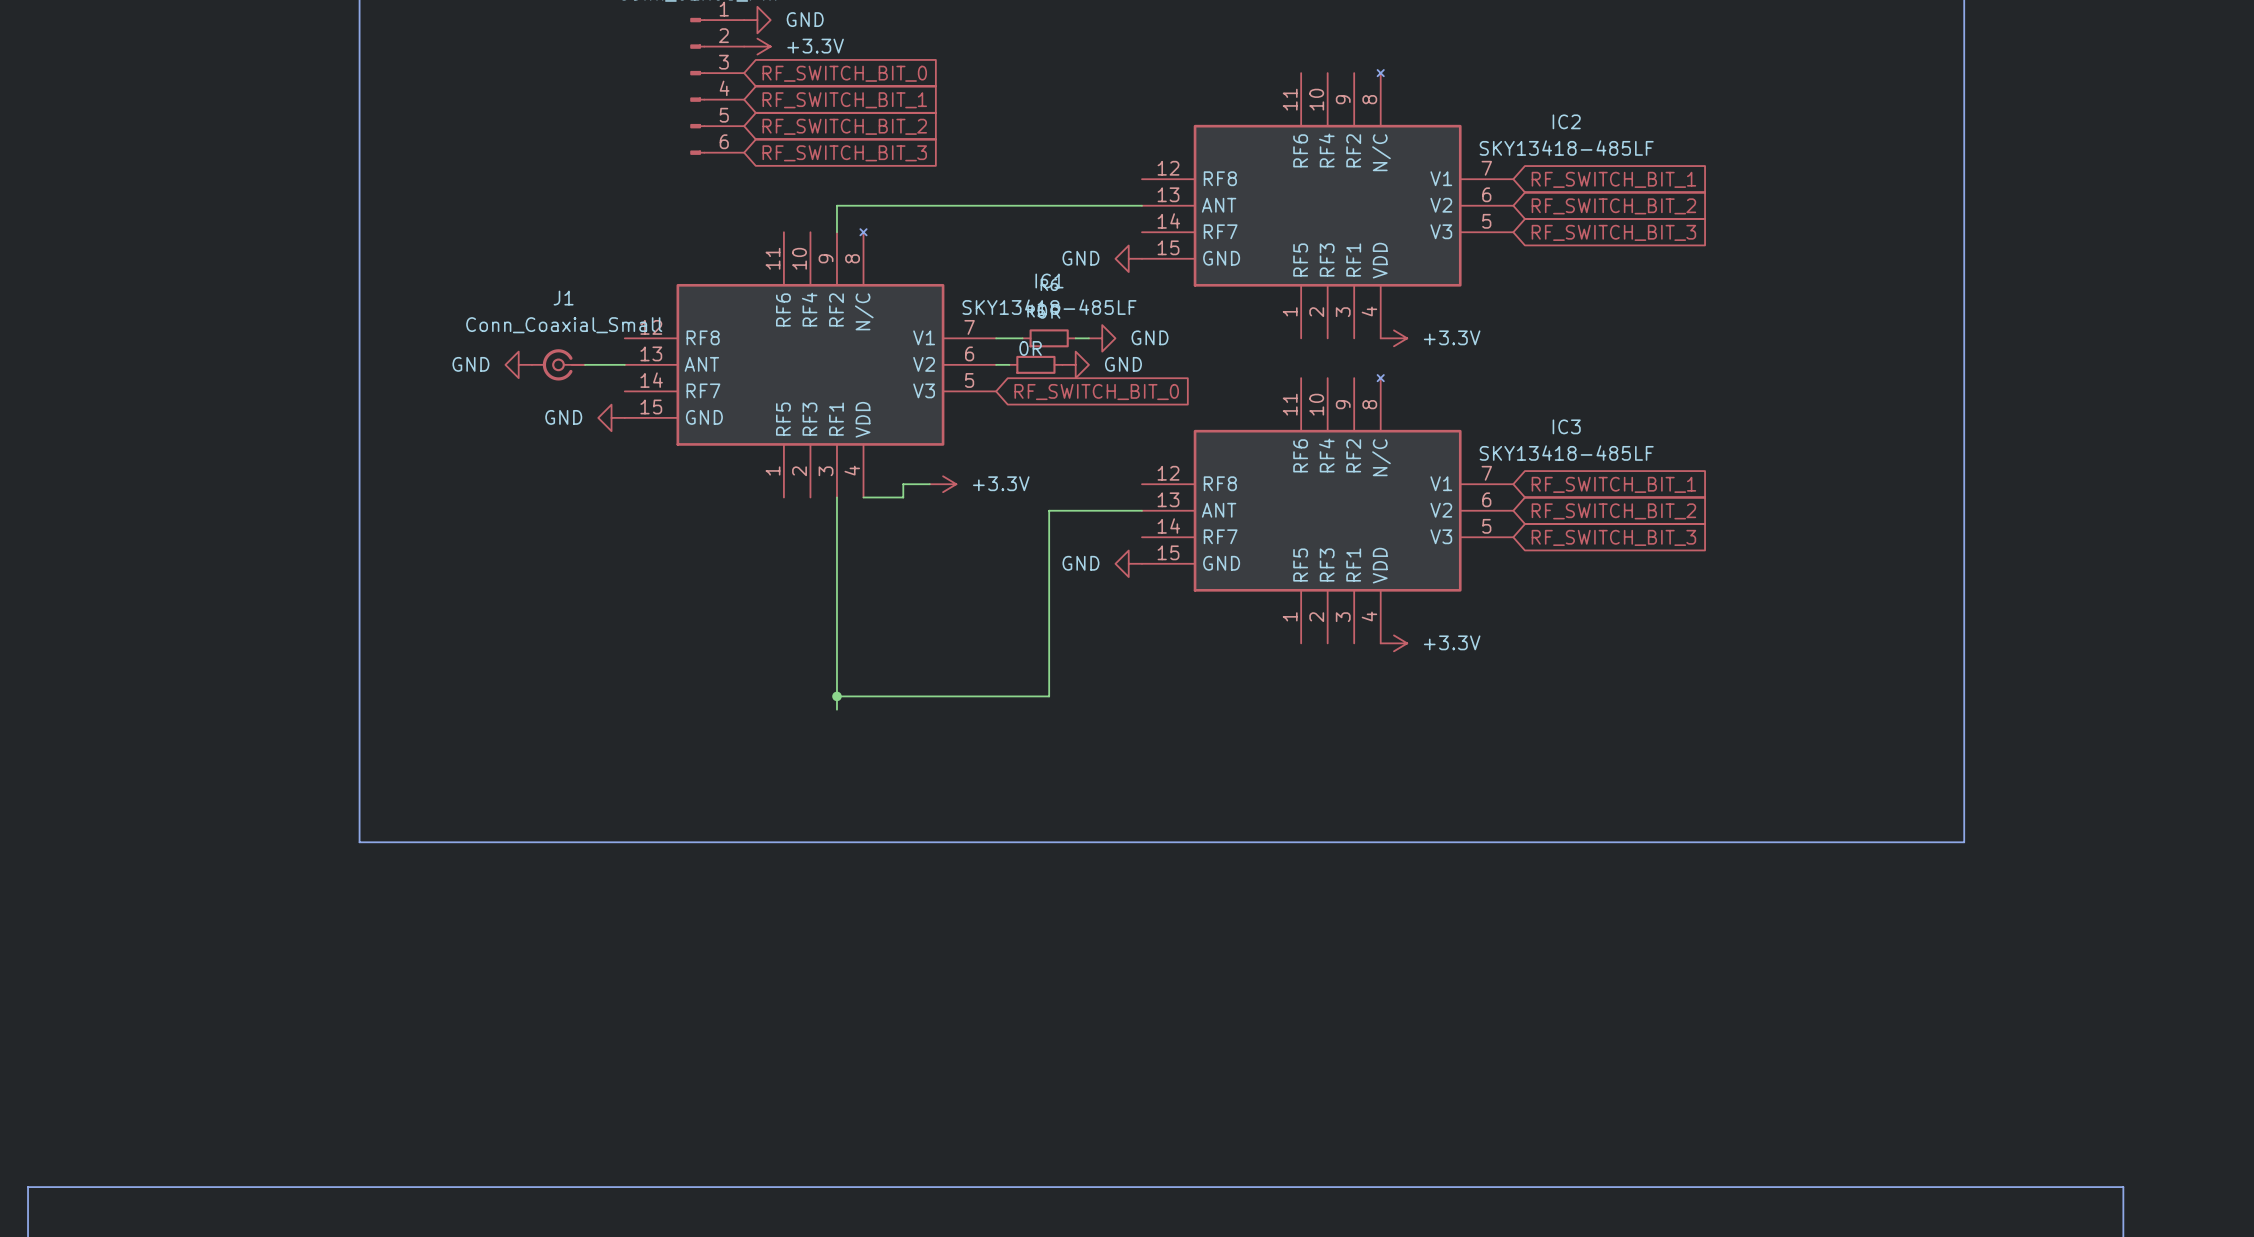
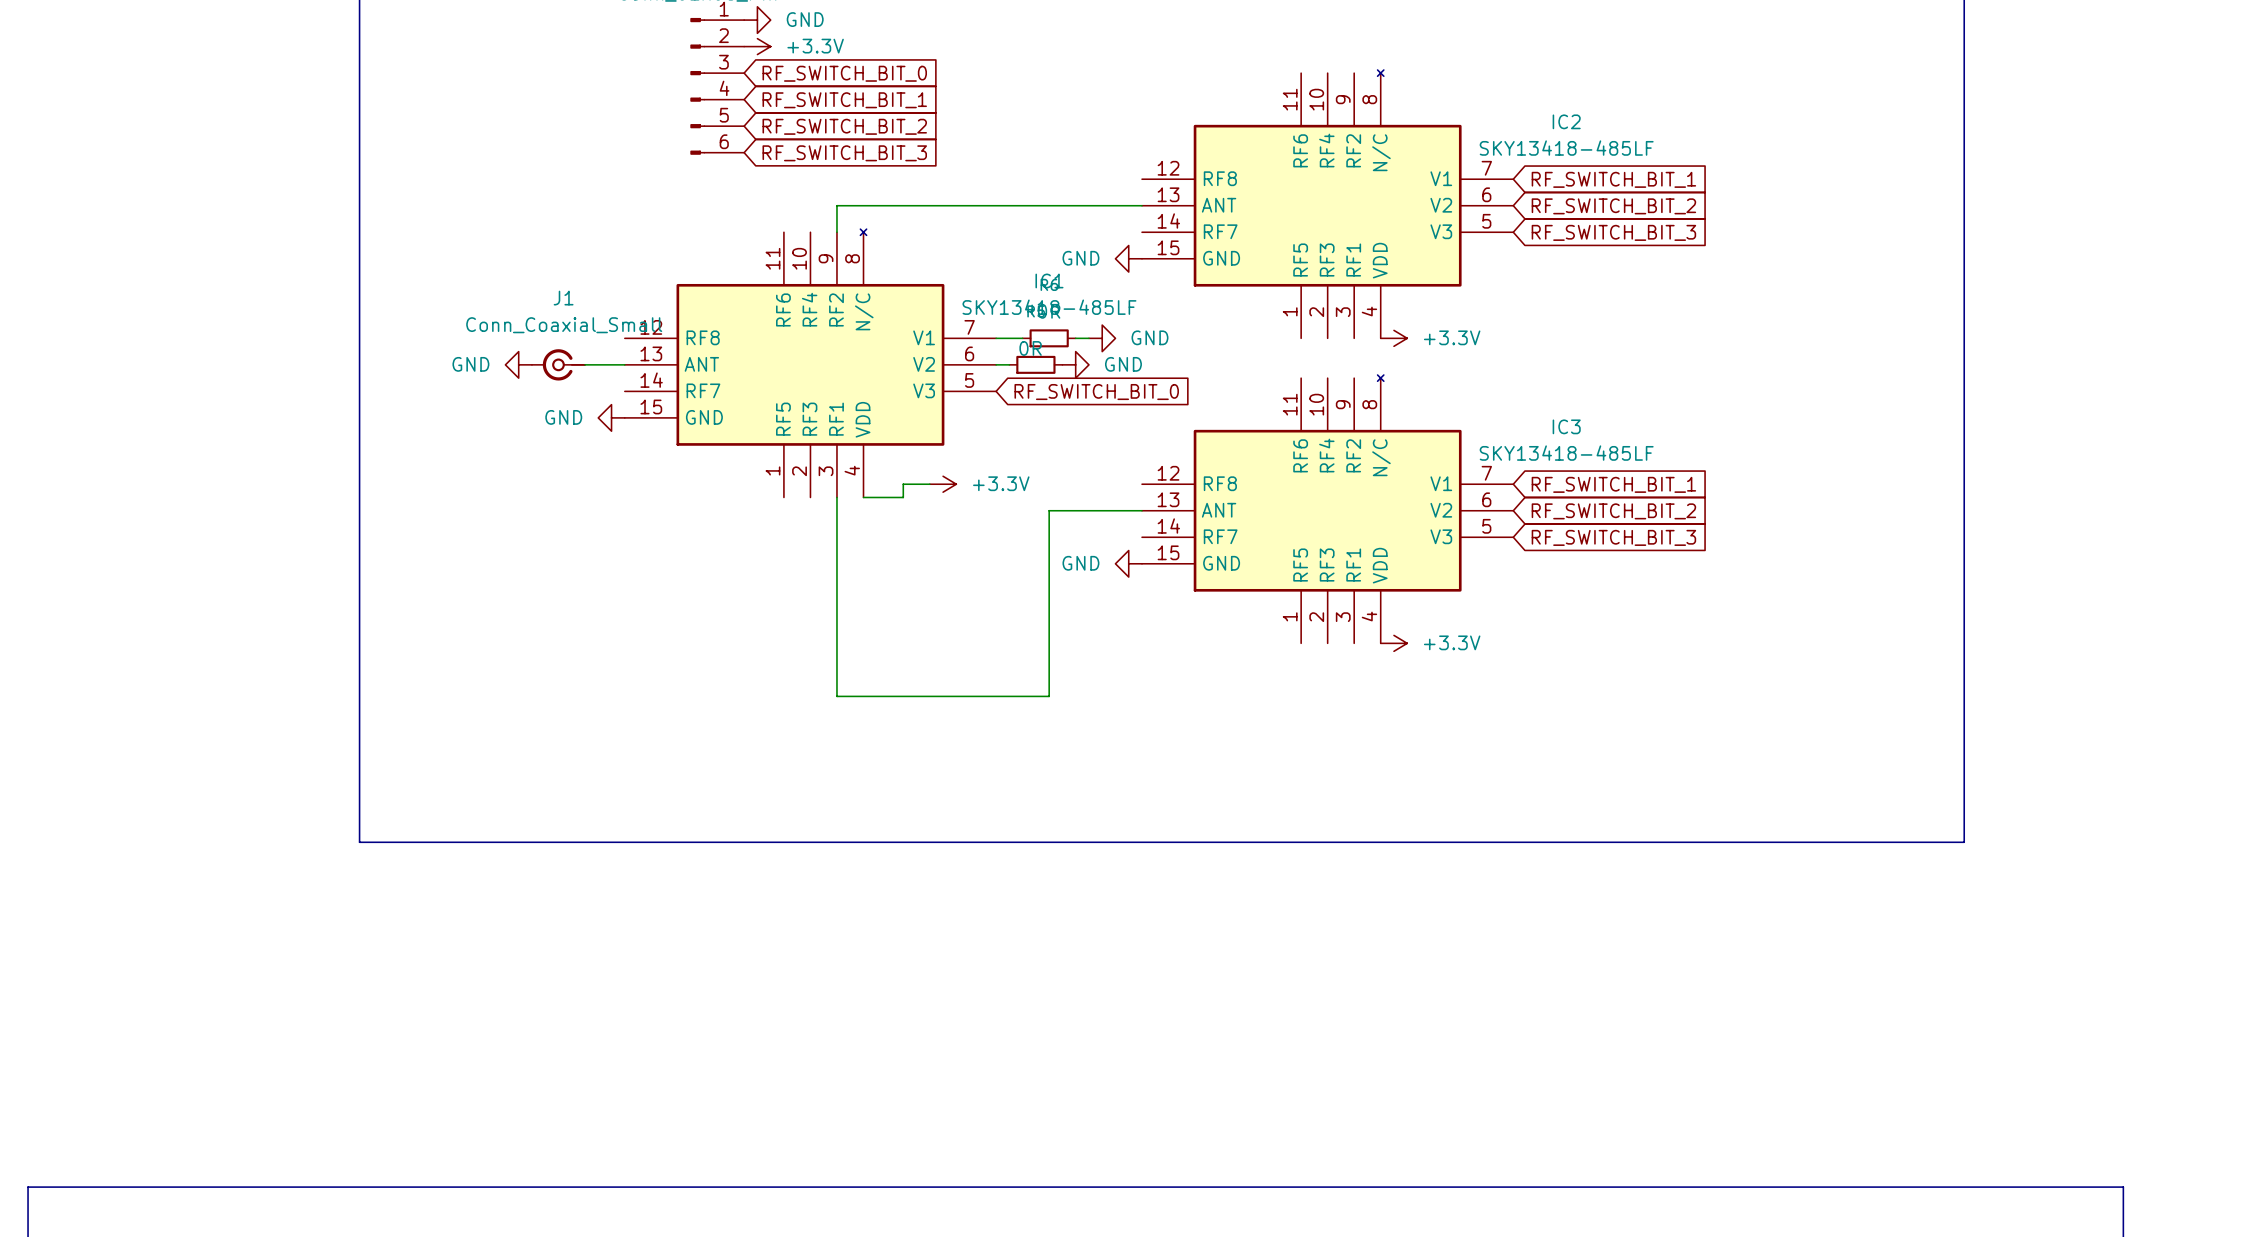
wire: (836, 696) (836, 709) -> none
junction: (836, 696) -> none

